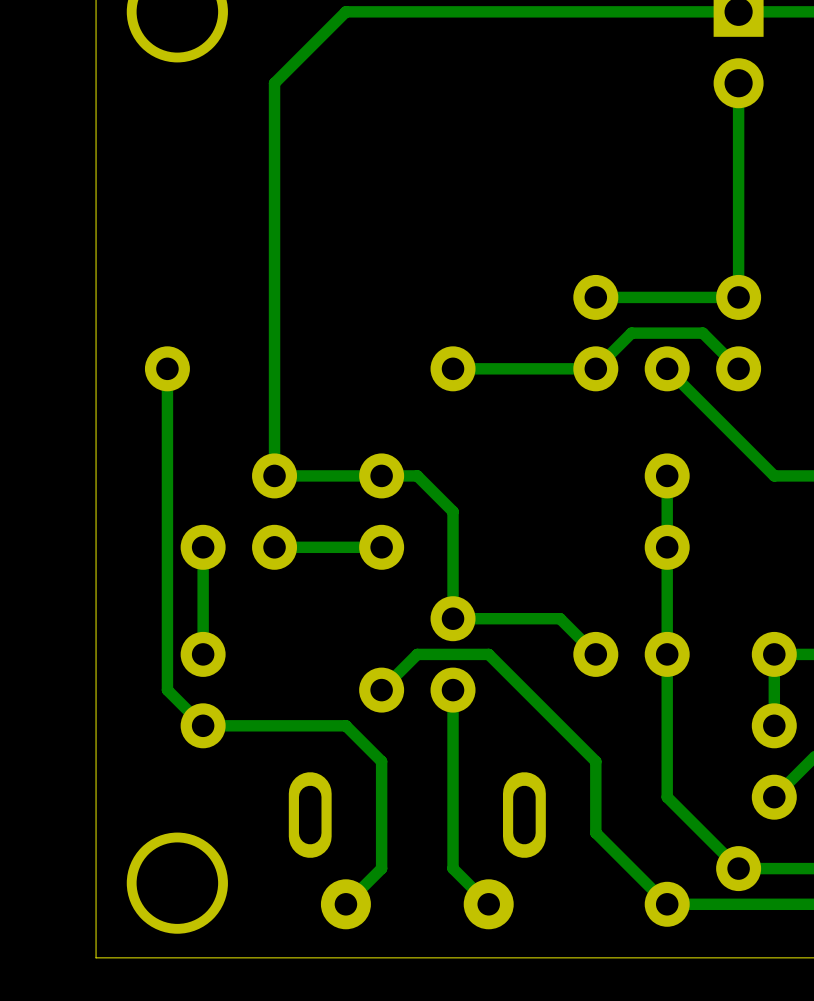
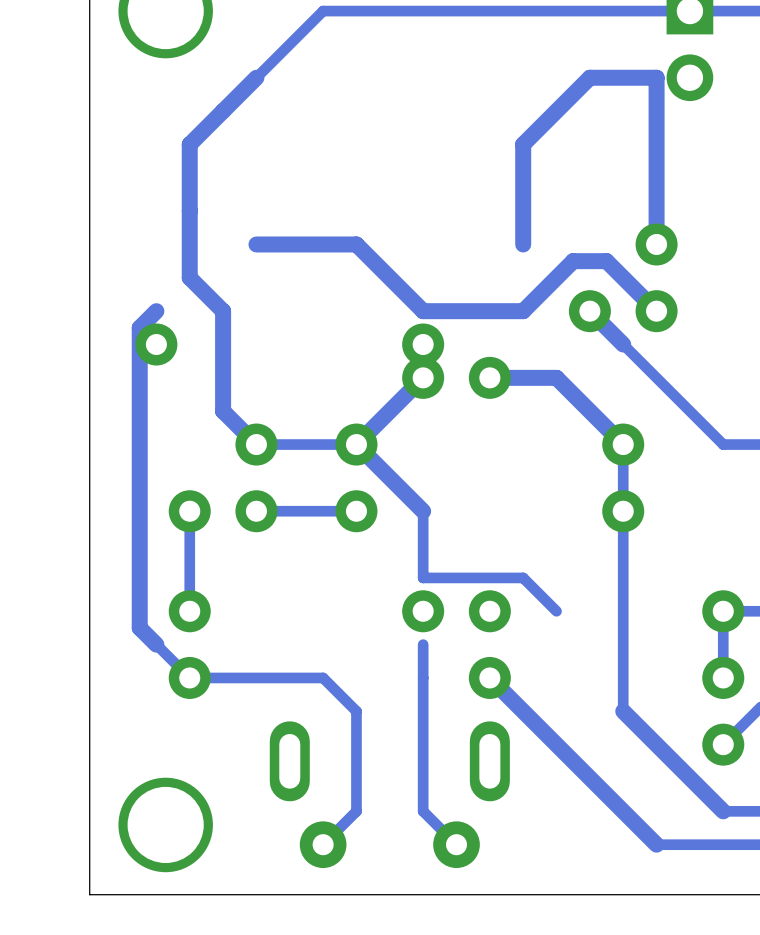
track: (274, 83) (274, 475) -> (256, 77) (189, 144) (189, 277) (223, 311) (223, 411) (256, 444)
track: (738, 83) (738, 297) (595, 297) -> none
track: none -> (256, 244) (356, 244) (423, 311) (523, 311) (573, 261) (606, 261) (656, 311)
track: none -> (656, 244) (656, 77) (589, 77) (523, 144) (523, 244)
part rotation: 0° (595, 333) -> 90° clockwise (456, 377)
part position: (595, 333) -> (456, 377)
track: none -> (589, 311) (623, 344)
part position: (702, 333) -> (623, 277)
track: (167, 368) (167, 690) -> (156, 311) (139, 327) (139, 627) (156, 644)
track: (738, 368) (702, 333) (631, 333) (595, 368) (453, 368) -> none
track: none -> (489, 377) (556, 377) (623, 444)
track: (381, 475) (417, 475) (453, 511) (453, 547) -> (423, 377) (356, 444) (423, 511)
part rotation: 0° (417, 654) -> 90° counterclockwise (456, 644)
part position: (417, 654) -> (456, 644)
part: (631, 654) -> none
track: (381, 690) (417, 654) (488, 654) (595, 761) (595, 832) (667, 904) (702, 904) -> (489, 677) (656, 844)
track: (667, 761) (667, 797) (738, 868) (774, 868) -> (623, 711) (723, 811)
part: (738, 868) -> none
part: (667, 904) -> none

